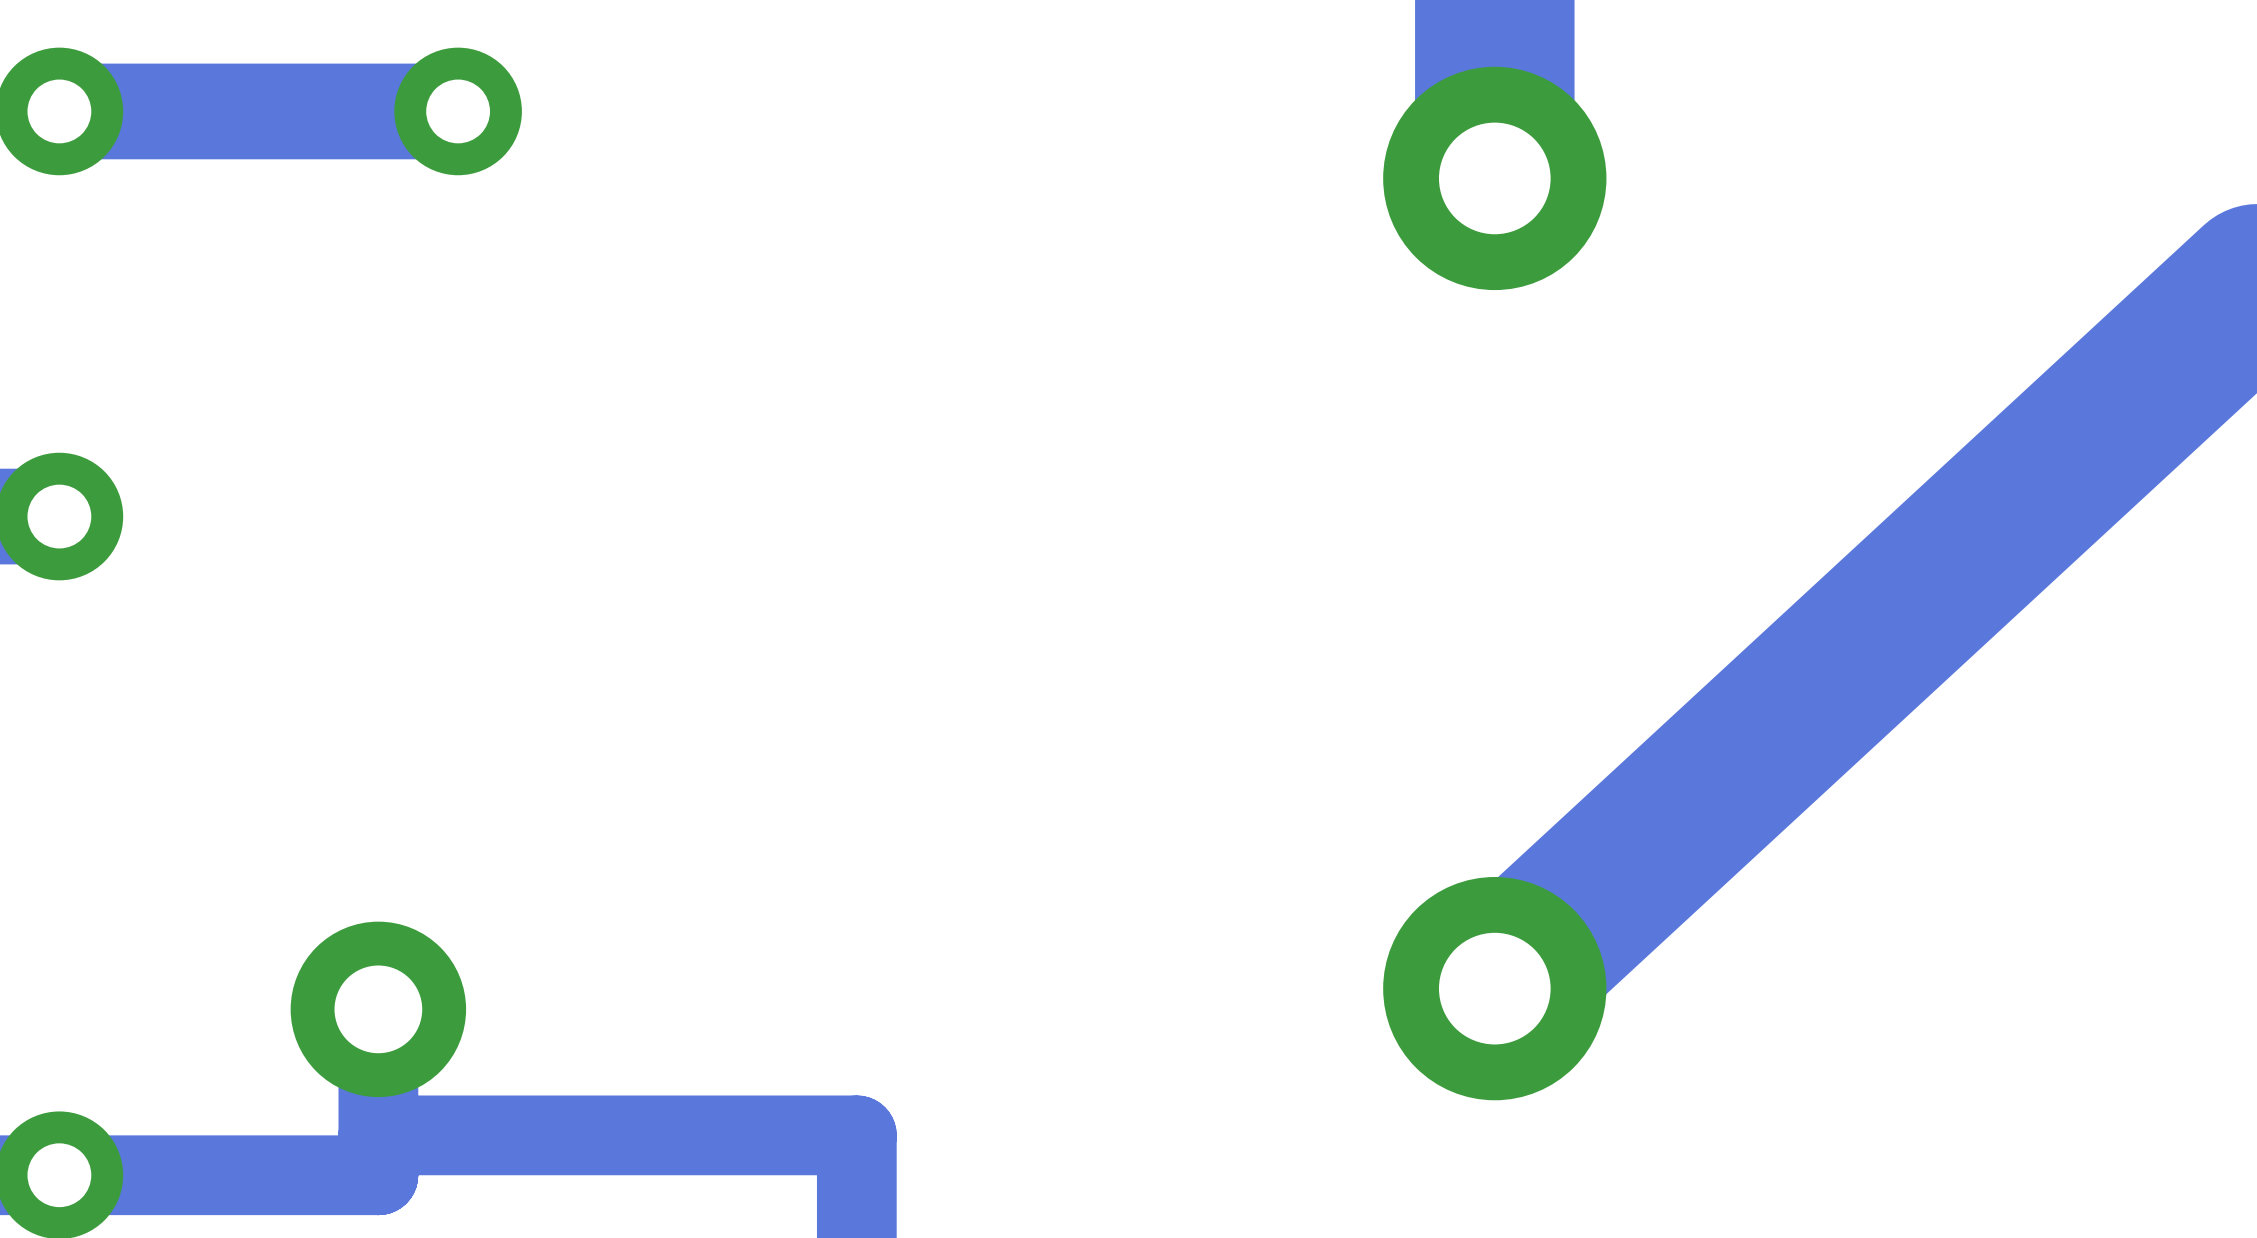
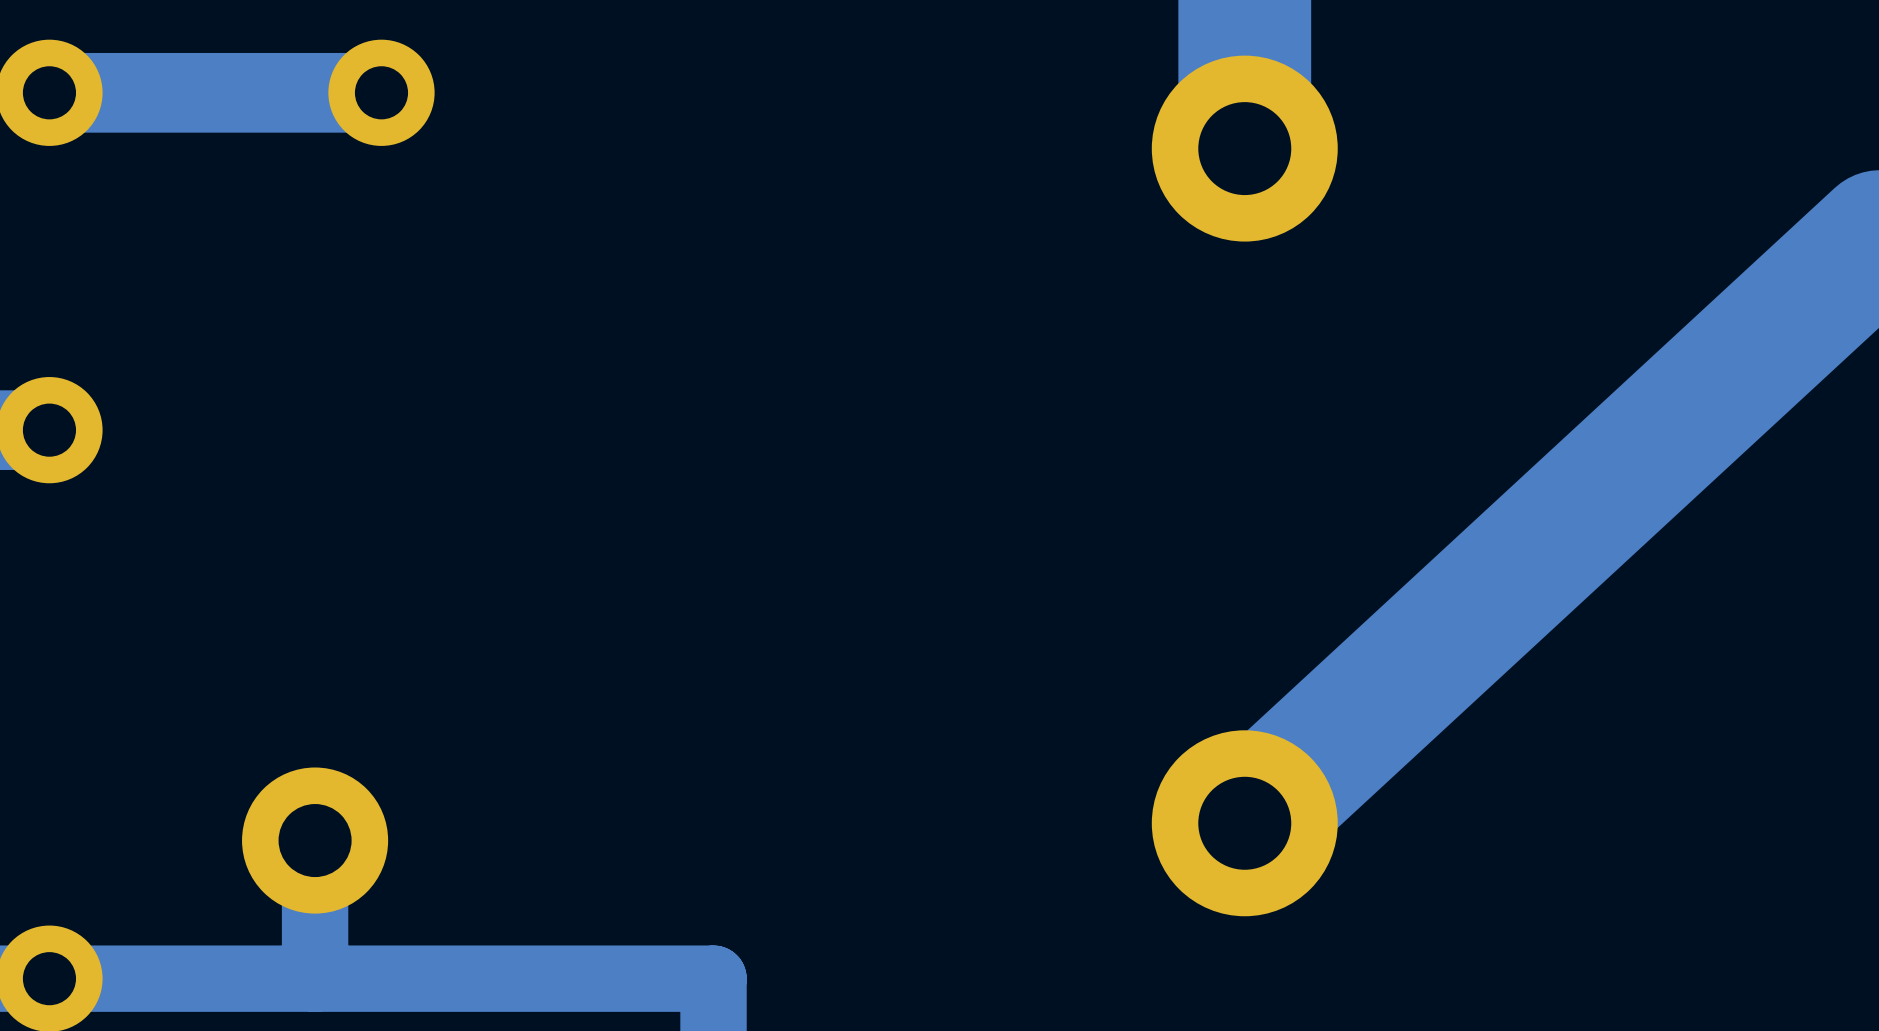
track: (378, 1135) (856, 1135) (856, 1175) -> (315, 978) (713, 978)

